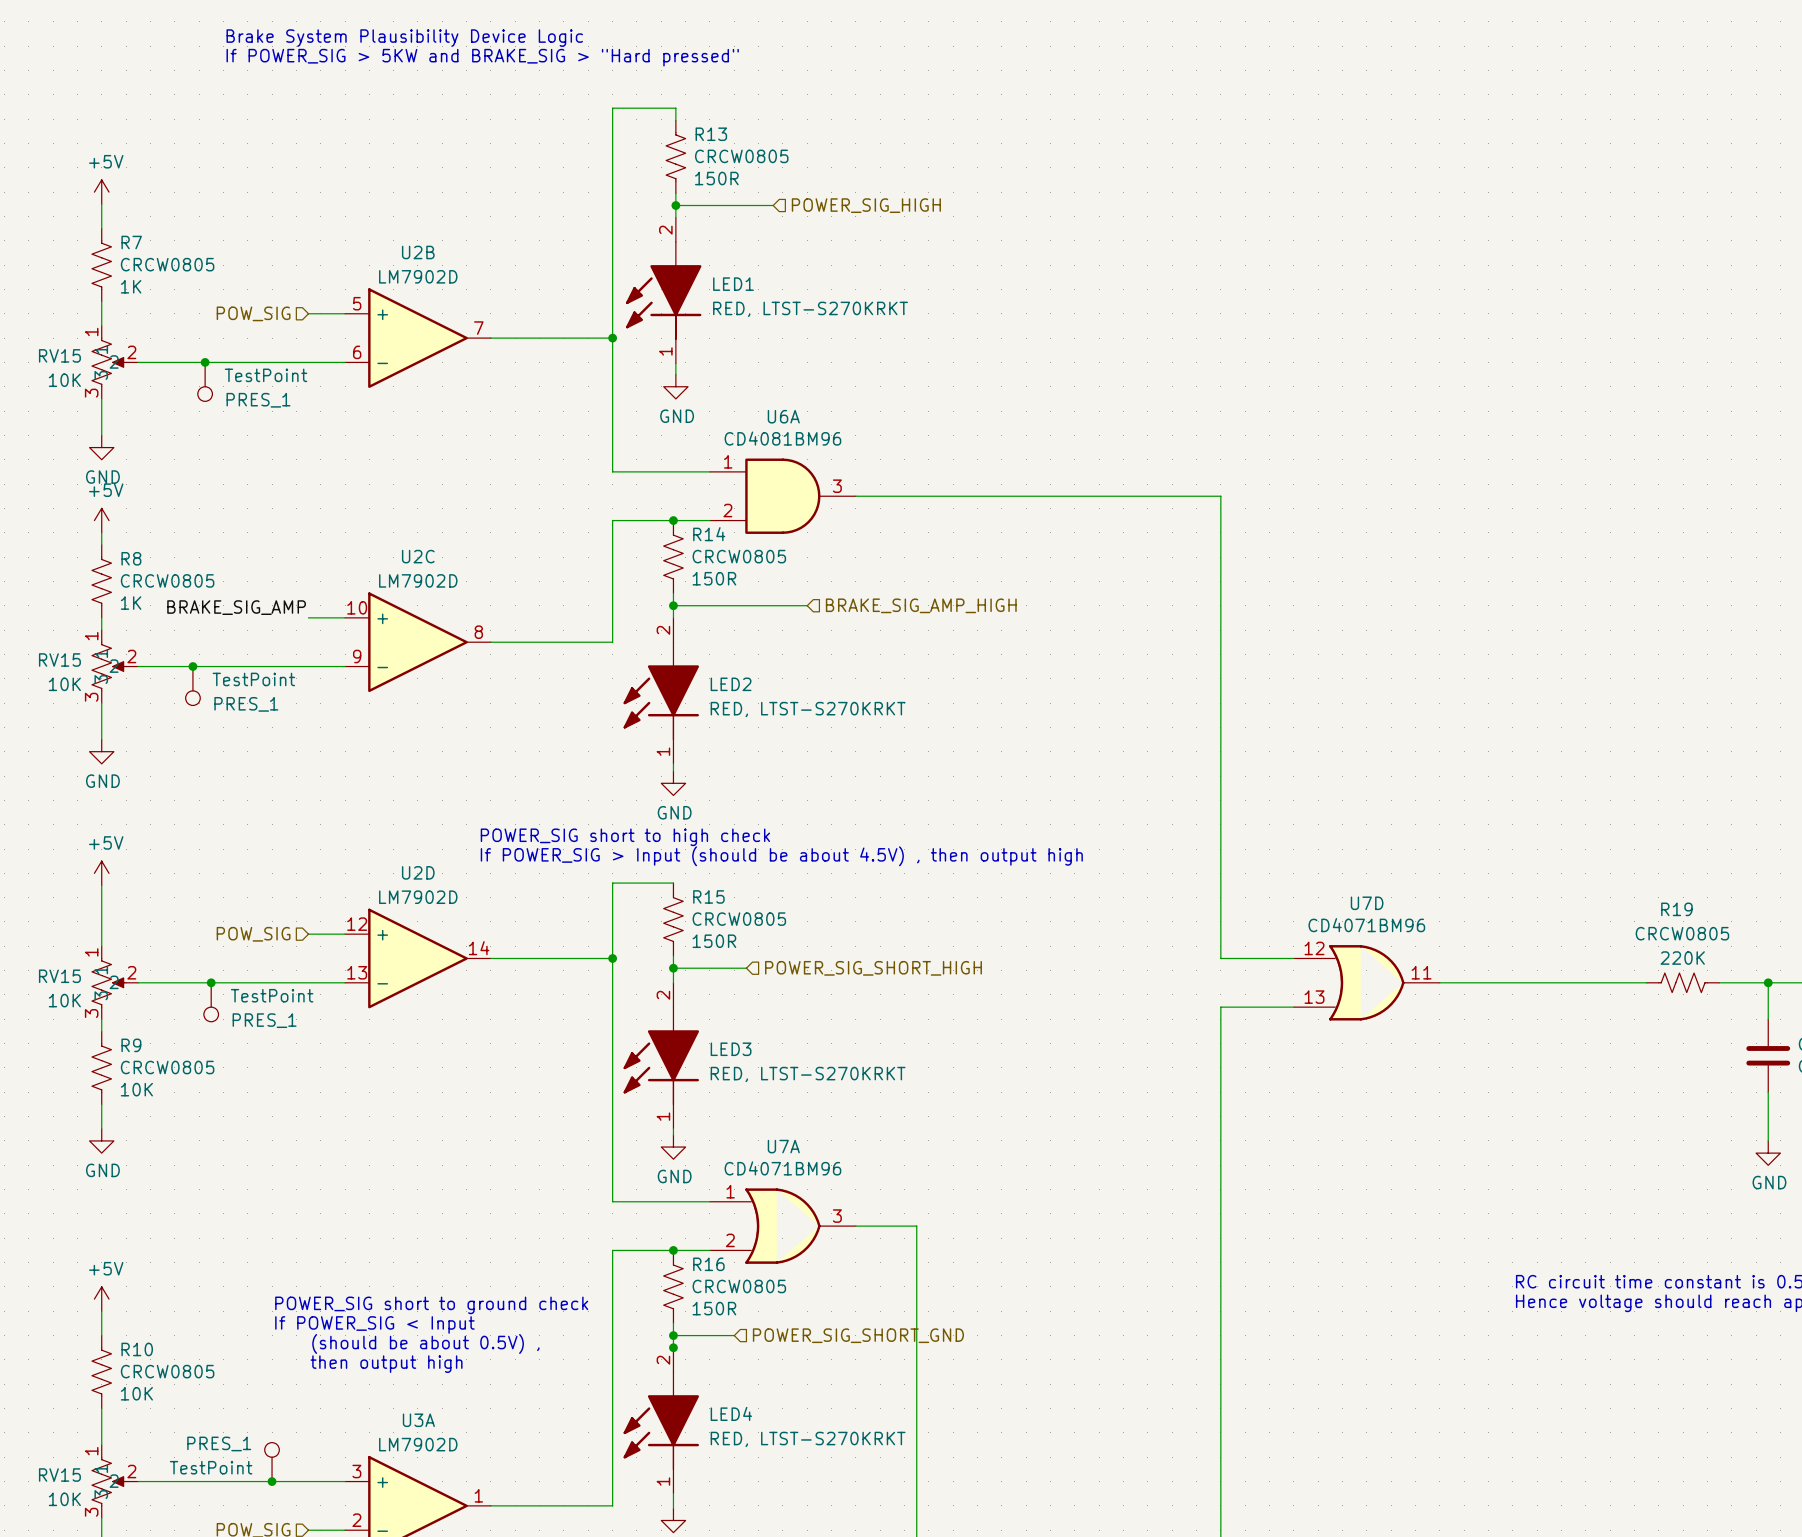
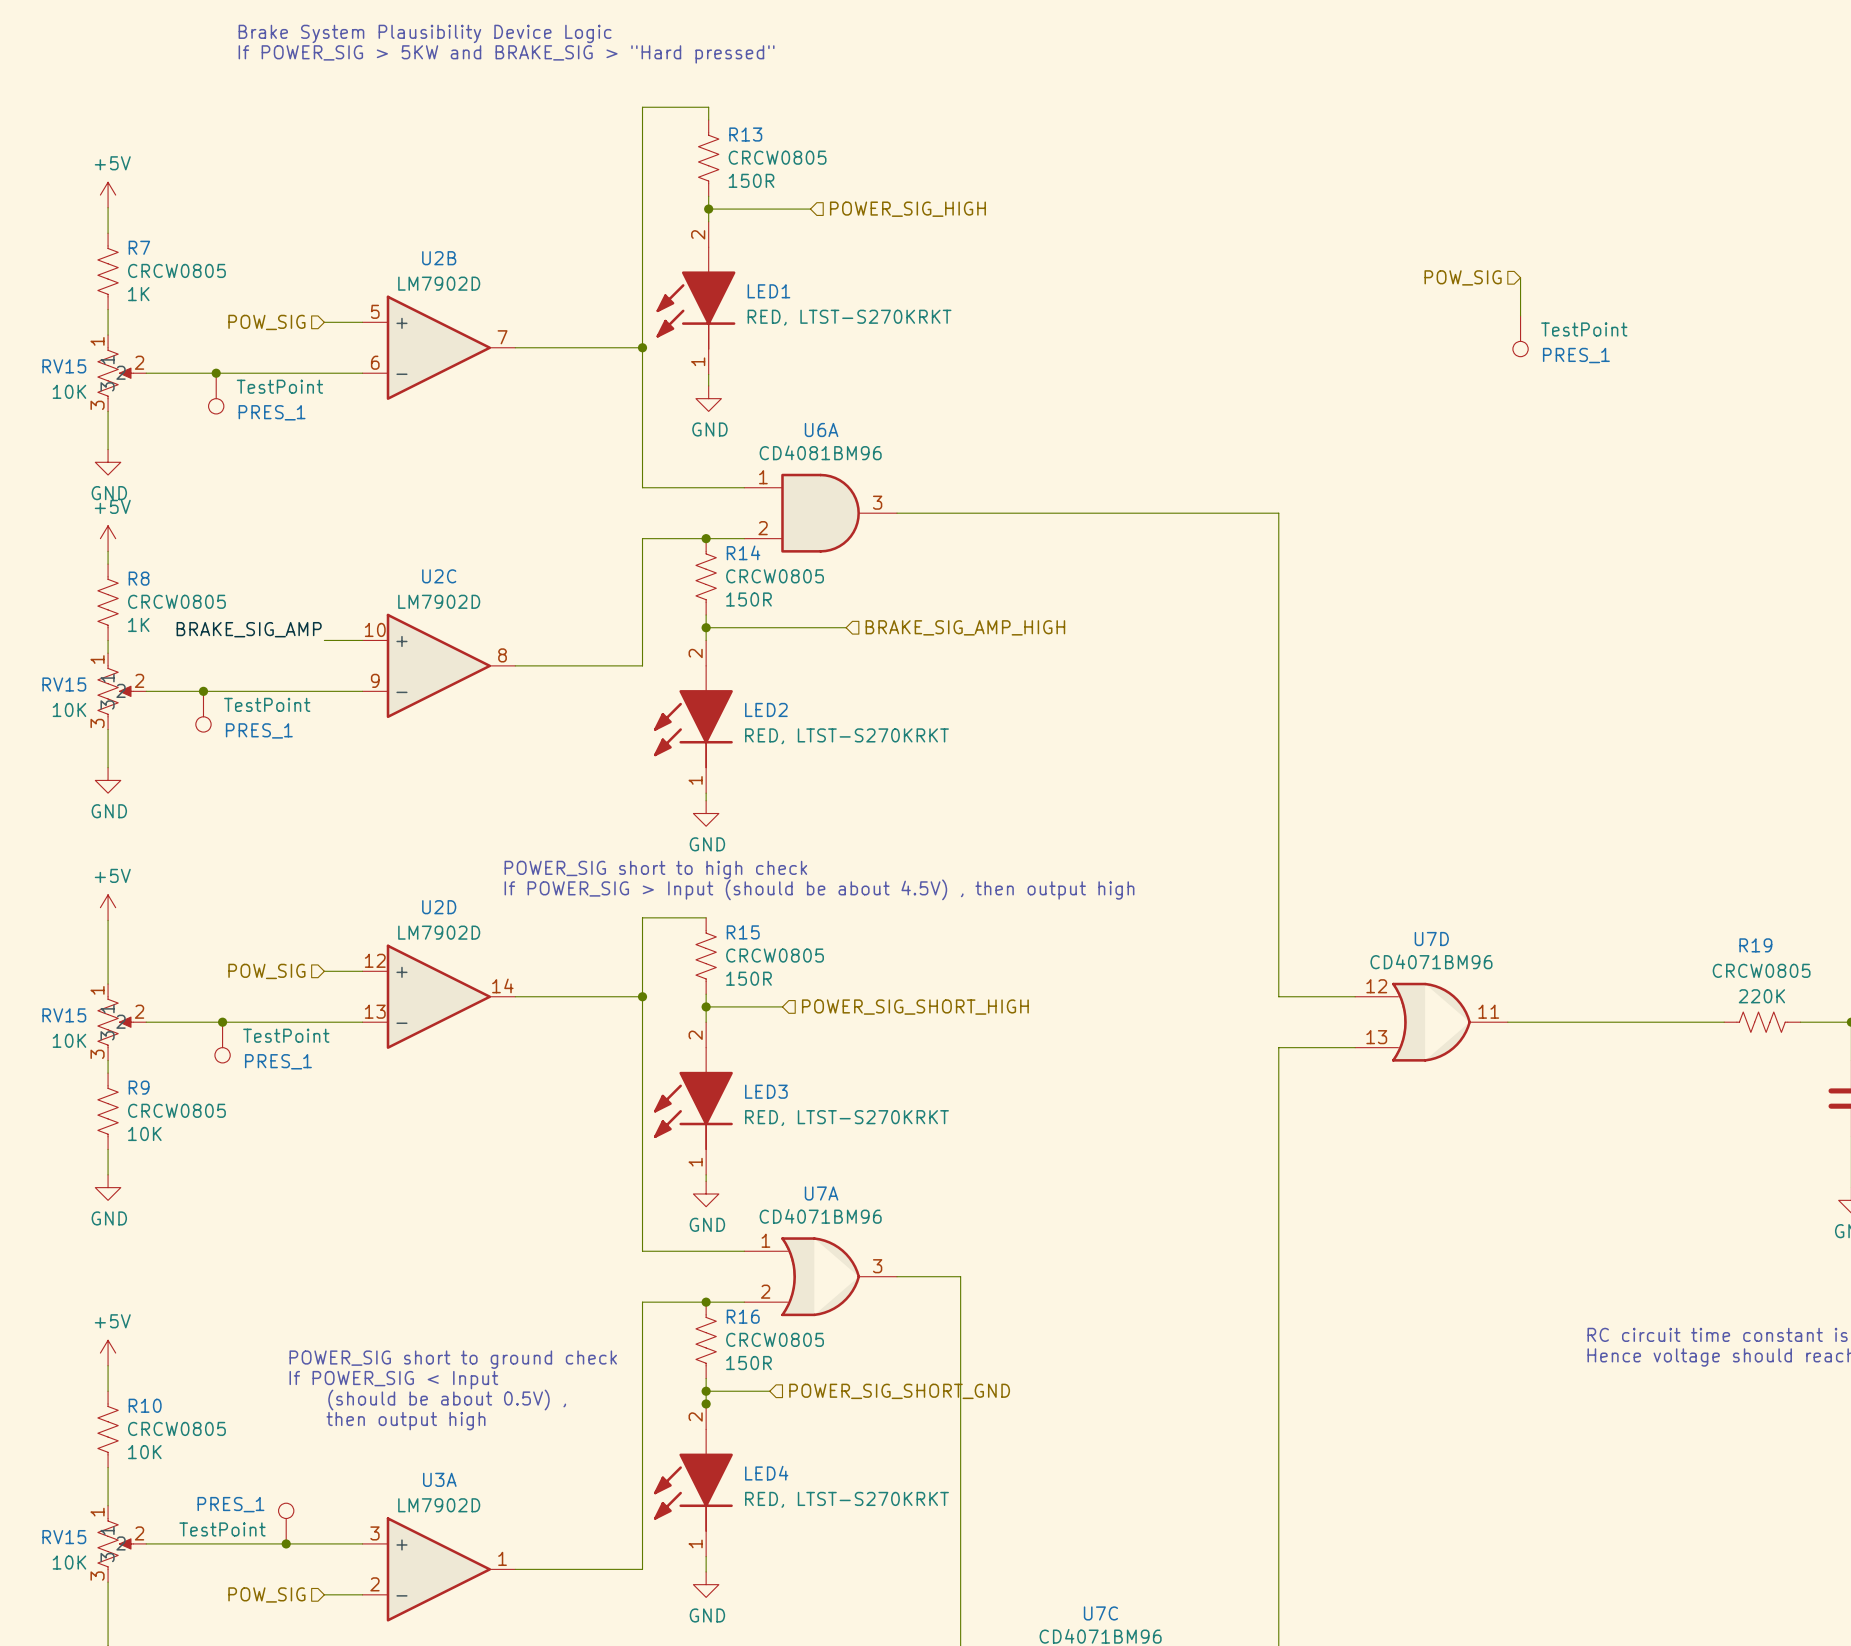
hierarchical label: none -> POW_SIG (1463, 277)
wire: none -> (1520, 277) (1520, 315)
PRES_1: none -> TestPoint (1520, 336)

